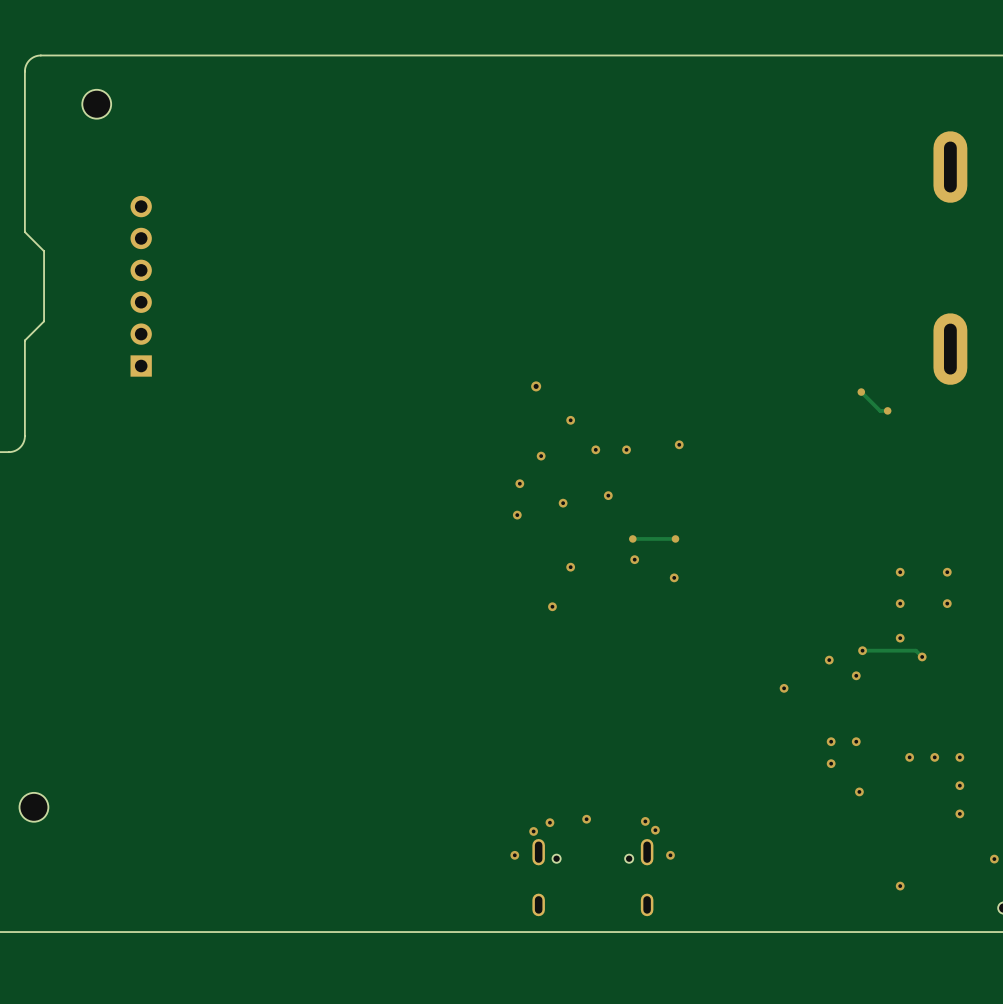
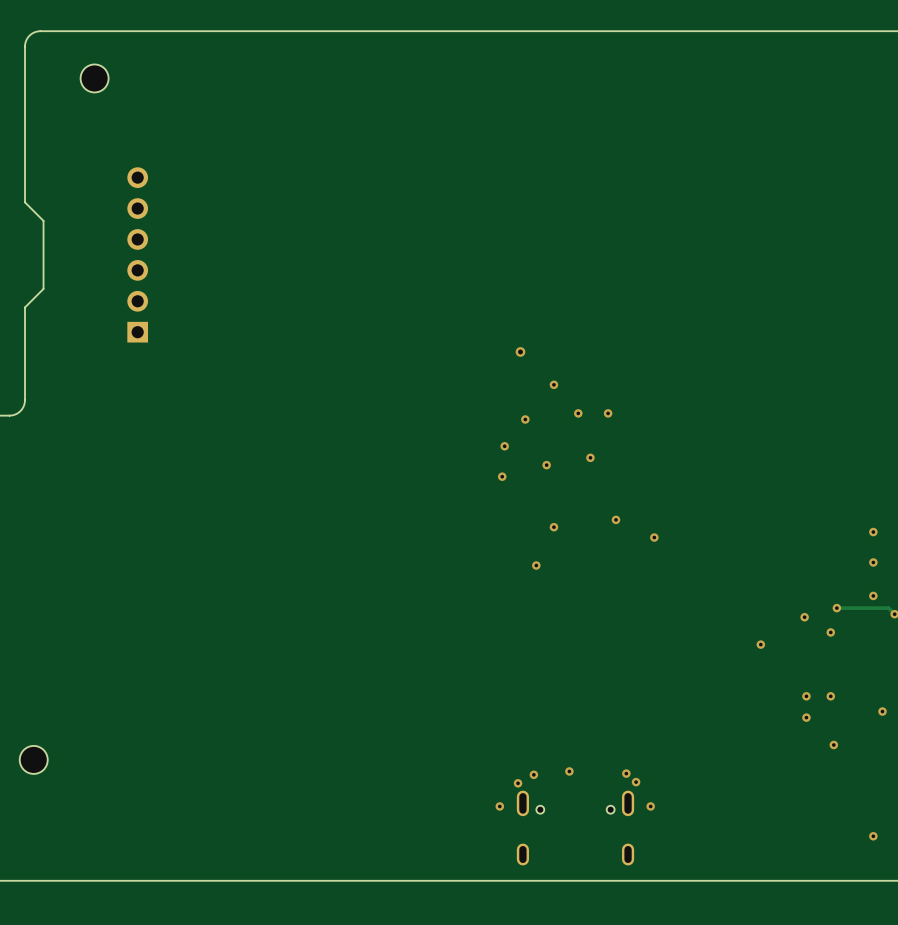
track: (861, 392) (880, 410) (887, 410) -> none
via: (861, 392) -> none
via: (887, 410) -> none
via: (679, 444) -> none
via: (632, 538) -> none
track: (675, 538) (632, 538) -> none
via: (675, 538) -> none

